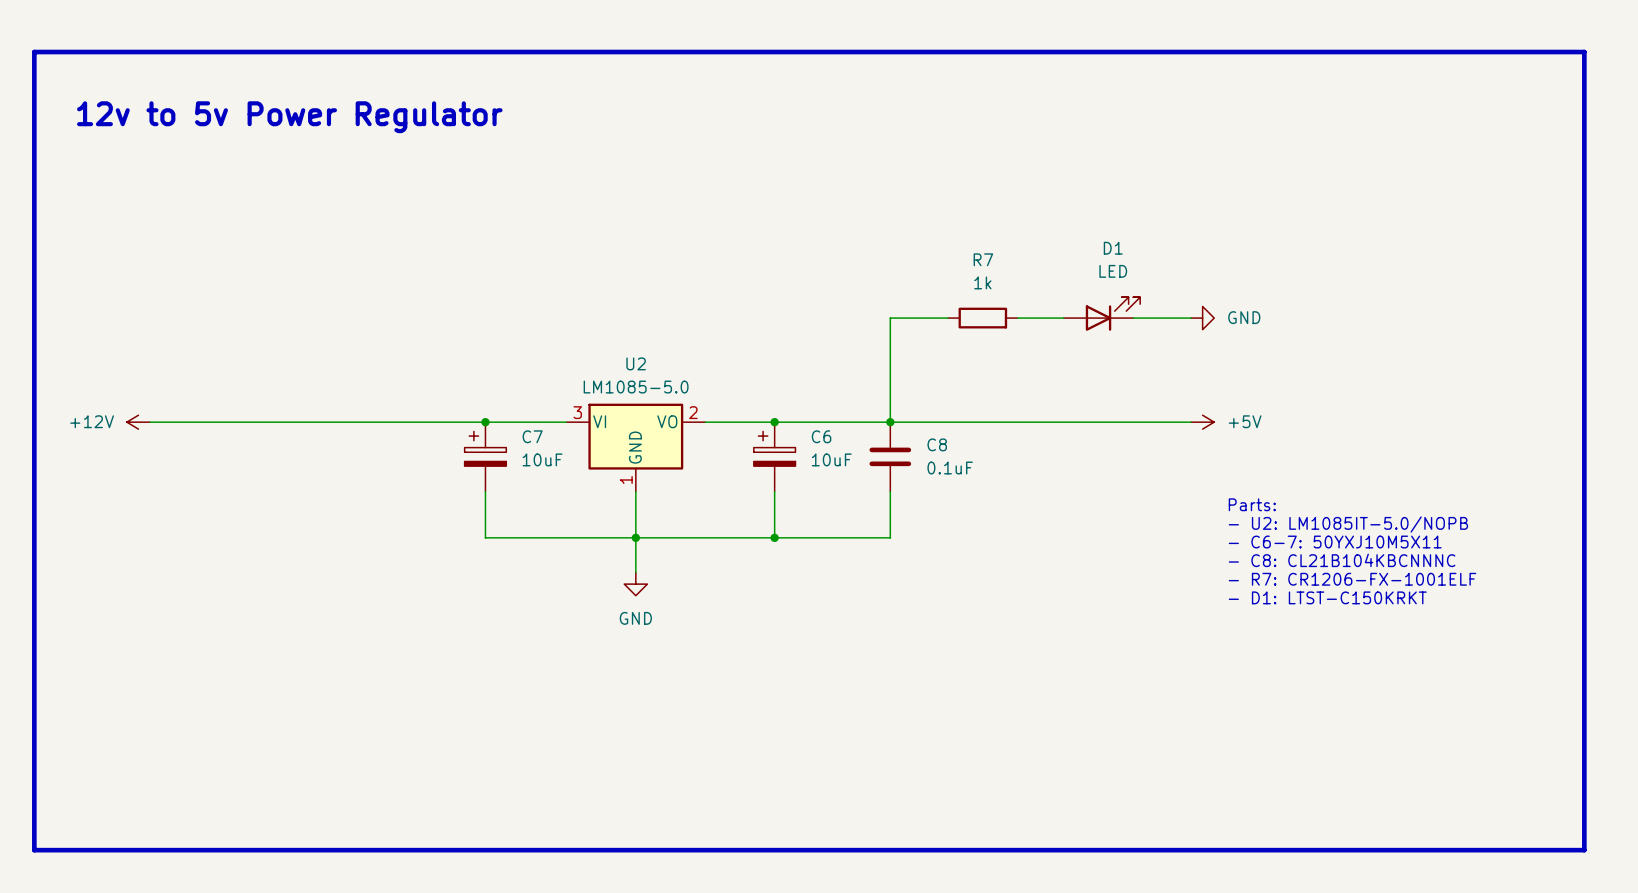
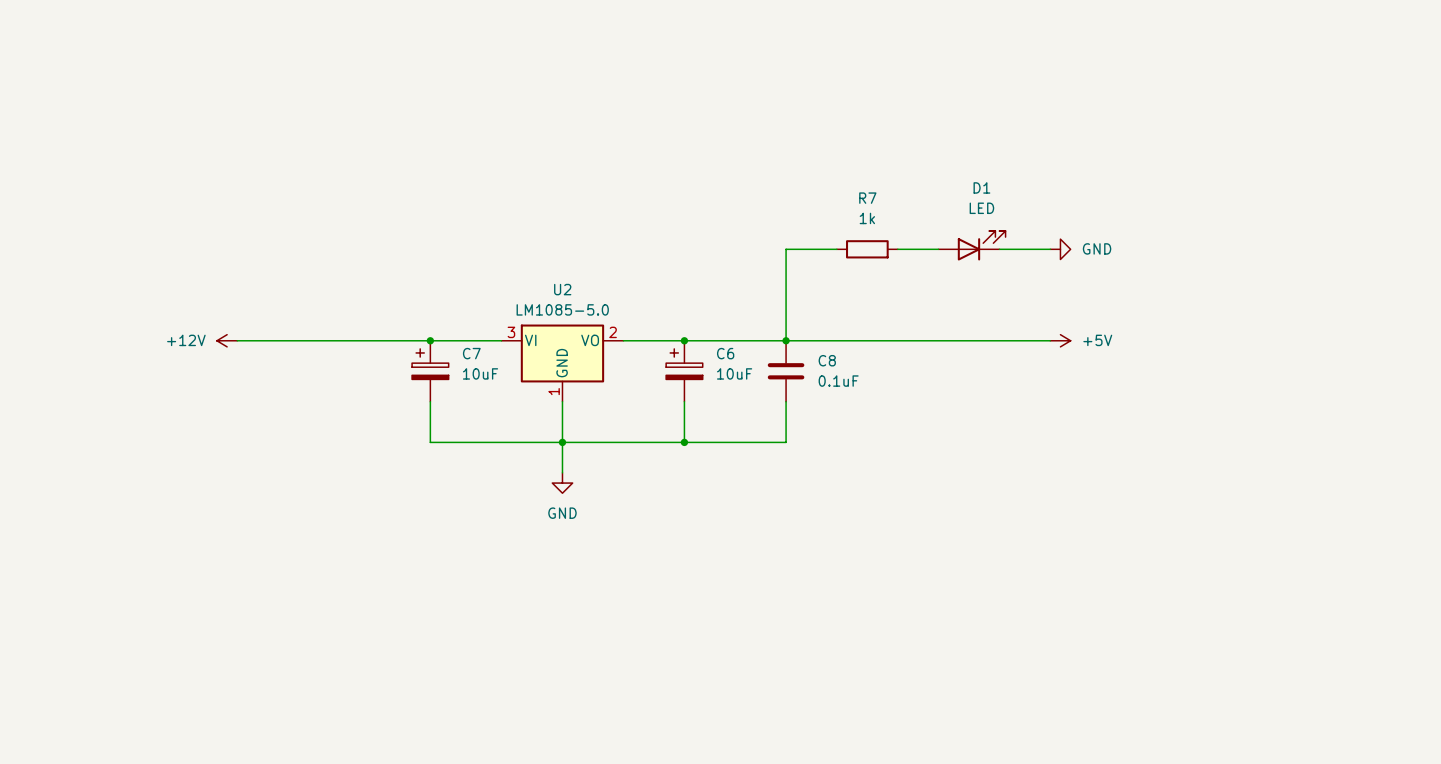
line: (34, 52) (1584, 52) (1584, 850) (34, 850) (34, 52) -> none
text: 12v to 5v Power Regulator (289, 117) -> none
power symbol position: +12V (138, 422) -> +12V (227, 340)
wire: (150, 422) (265, 422) -> none
text: Parts: (1252, 504) -> none
text: - U2: LM1085IT-5.0/NOPB (1348, 524) -> none
text: - C6-7: 50YXJ10M5X11 (1335, 542) -> none
text: - C8: CL21B104KBCNNNC (1342, 560) -> none
text: - R7: CR1206-FX-1001ELF (1352, 579) -> none
text: - D1: LTST-C150KRKT (1327, 597) -> none

